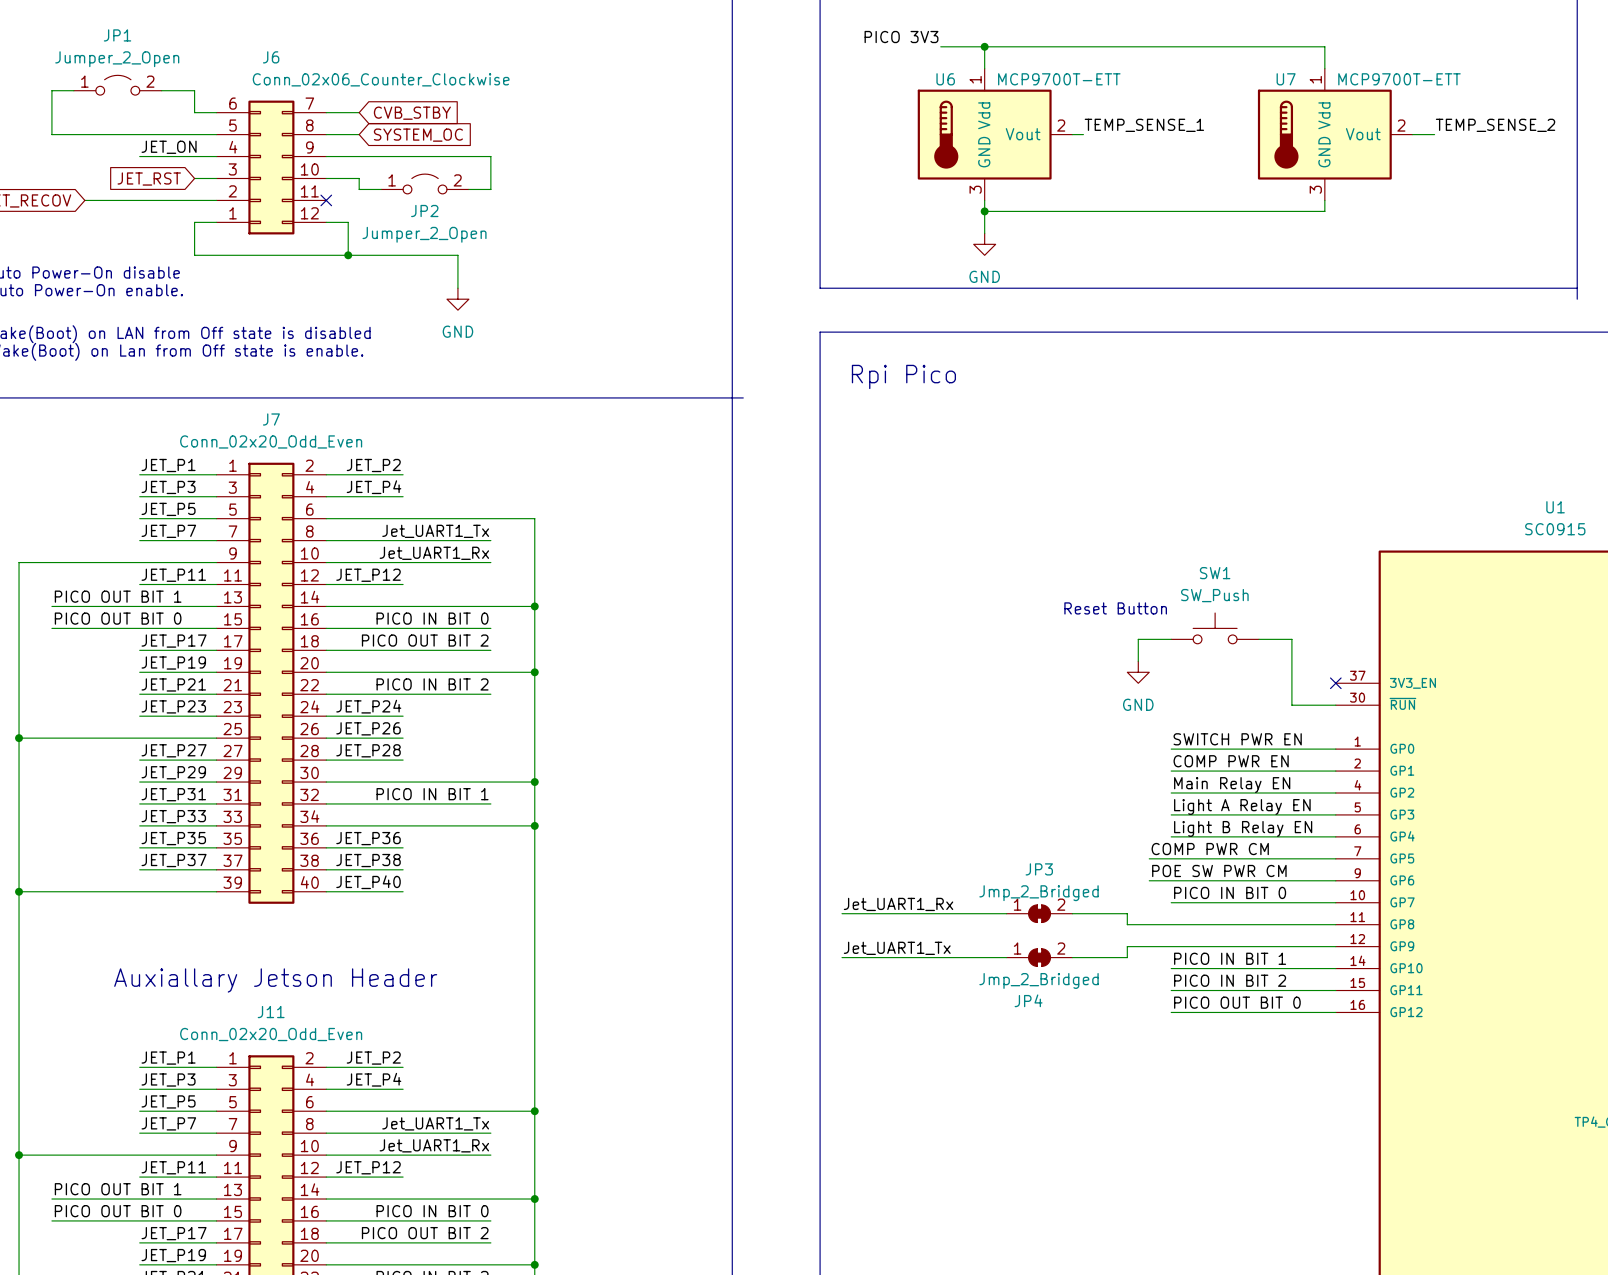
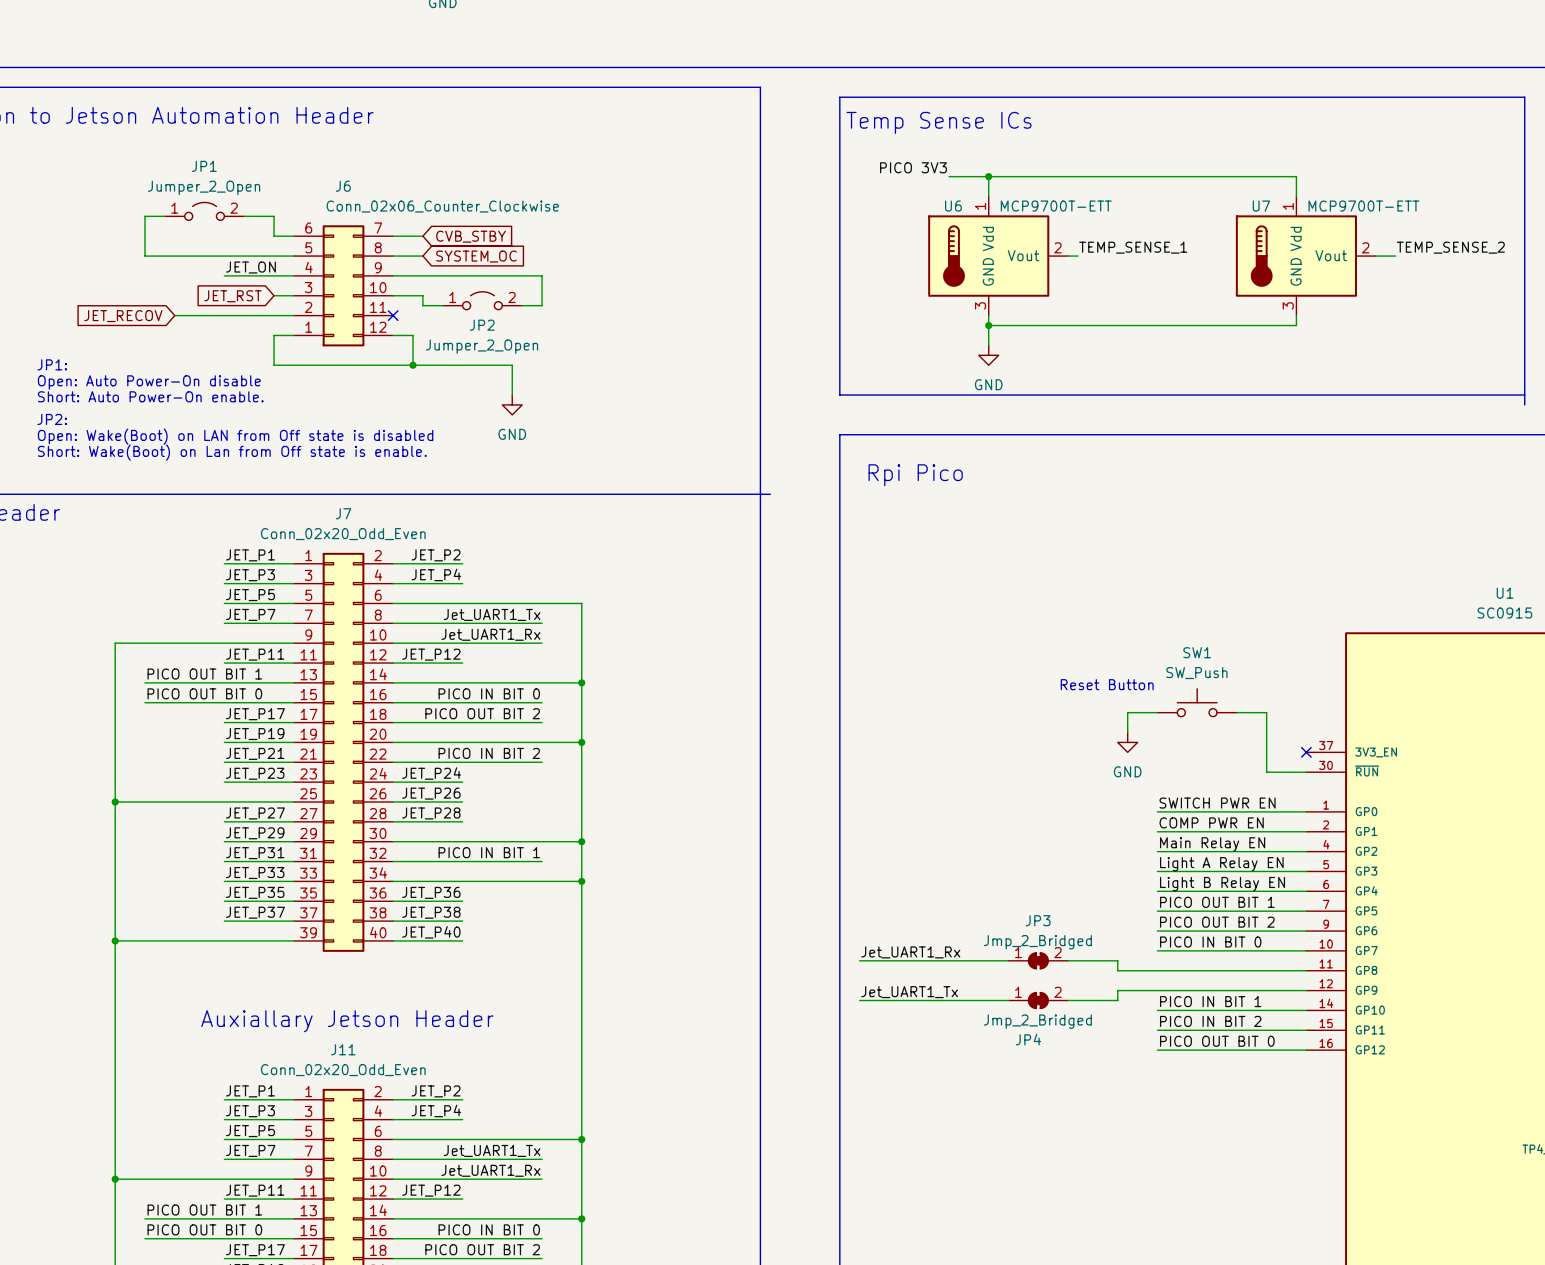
label: COMP PWR CM (1210, 849) -> none
label: none -> PICO OUT BIT 1 (1217, 902)
wire: (1149, 858) (1171, 858) -> none
label: POE SW PWR CM (1219, 870) -> none
label: none -> PICO OUT BIT 2 (1217, 922)
wire: (1149, 880) (1171, 880) -> none

